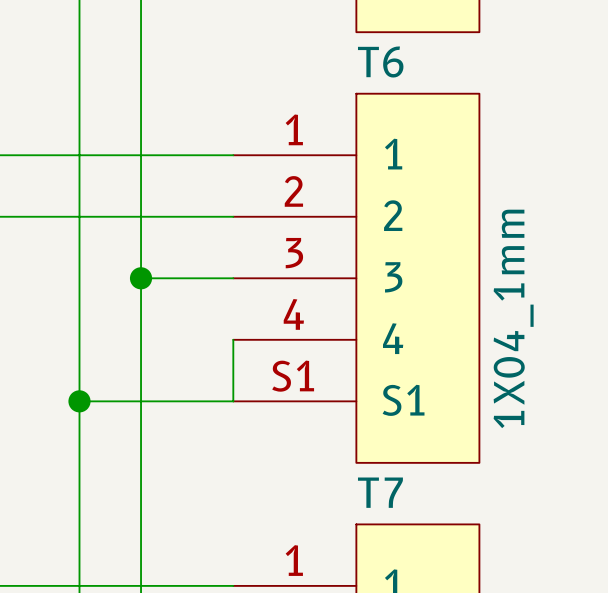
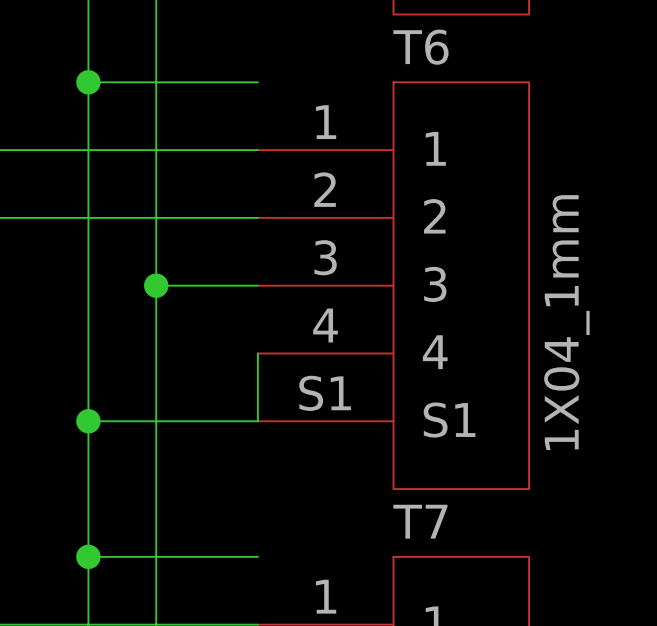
wire: none -> (88, 82) (257, 82)
junction: none -> (88, 82)
wire: none -> (88, 556) (257, 556)
junction: none -> (88, 556)

